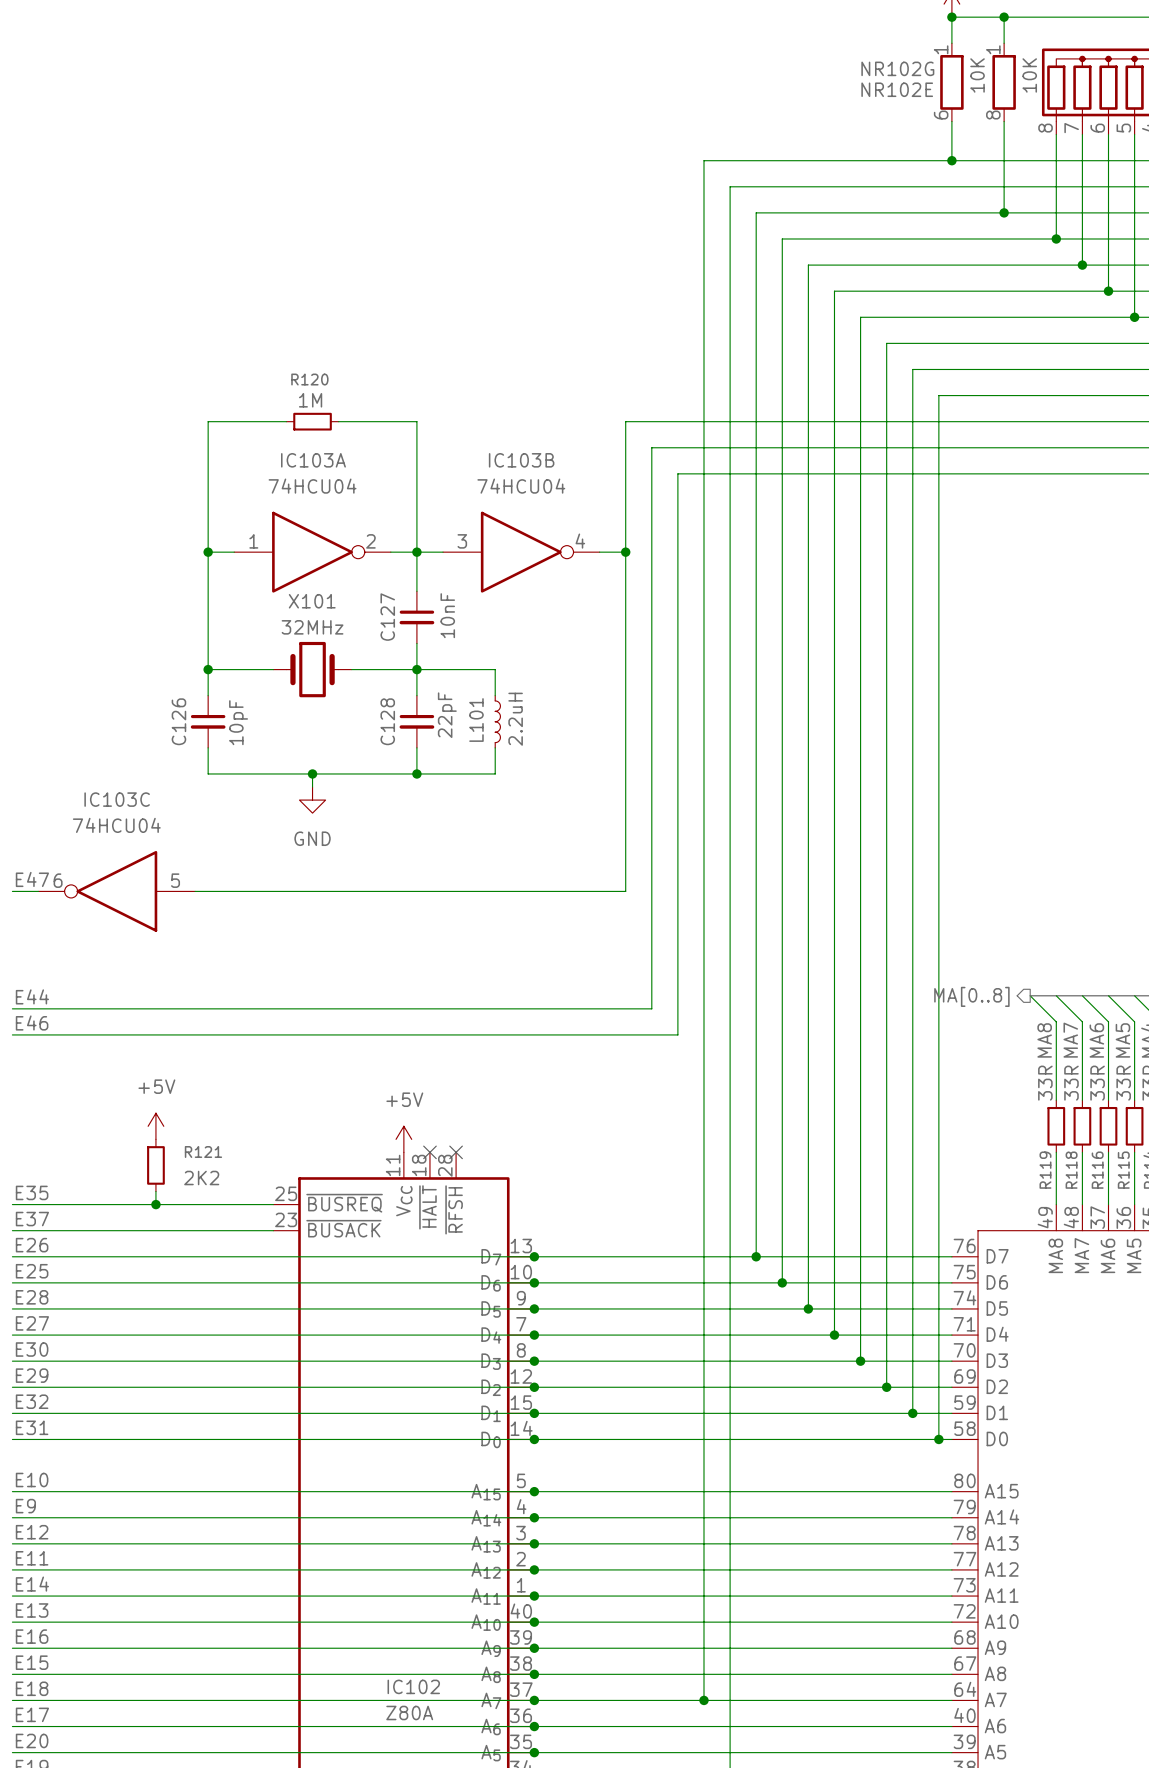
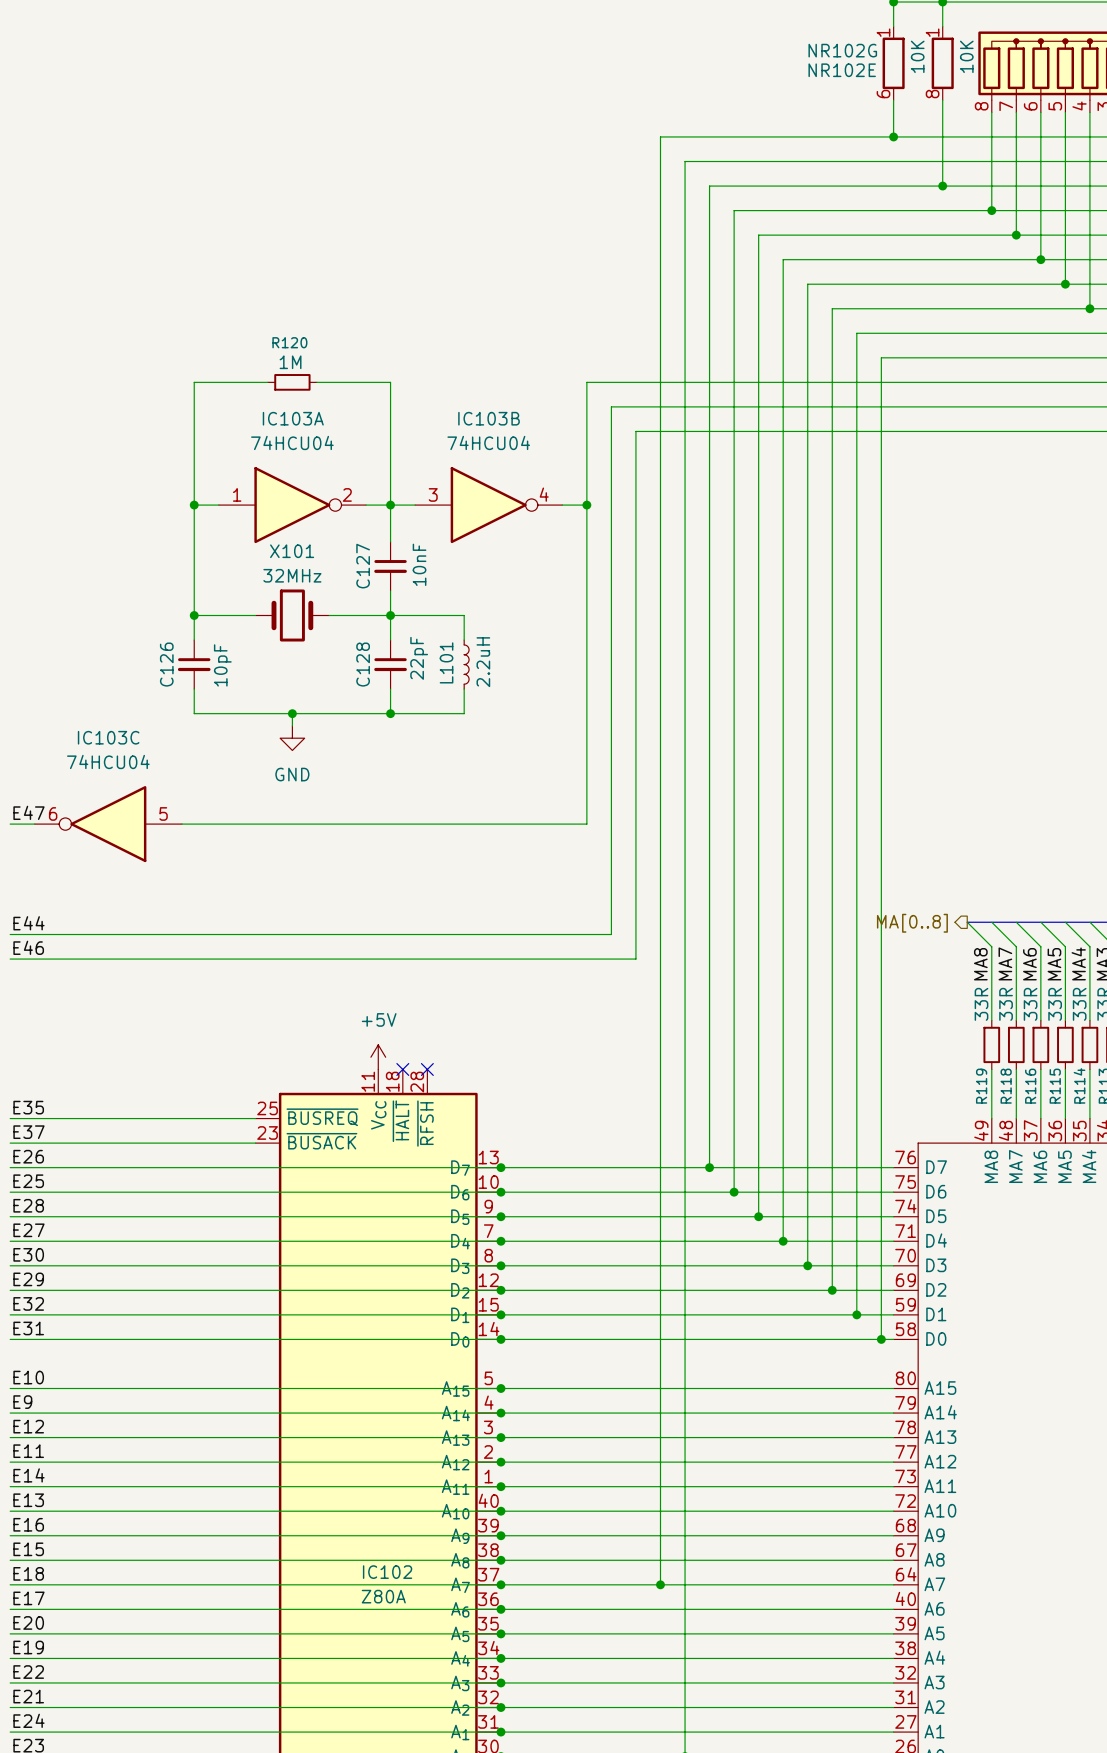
power symbol: +5V (155, 1126) -> none
R121: 2K2 (155, 1165) -> none
wire: (155, 1191) (155, 1204) -> none
junction: (155, 1204) -> none

